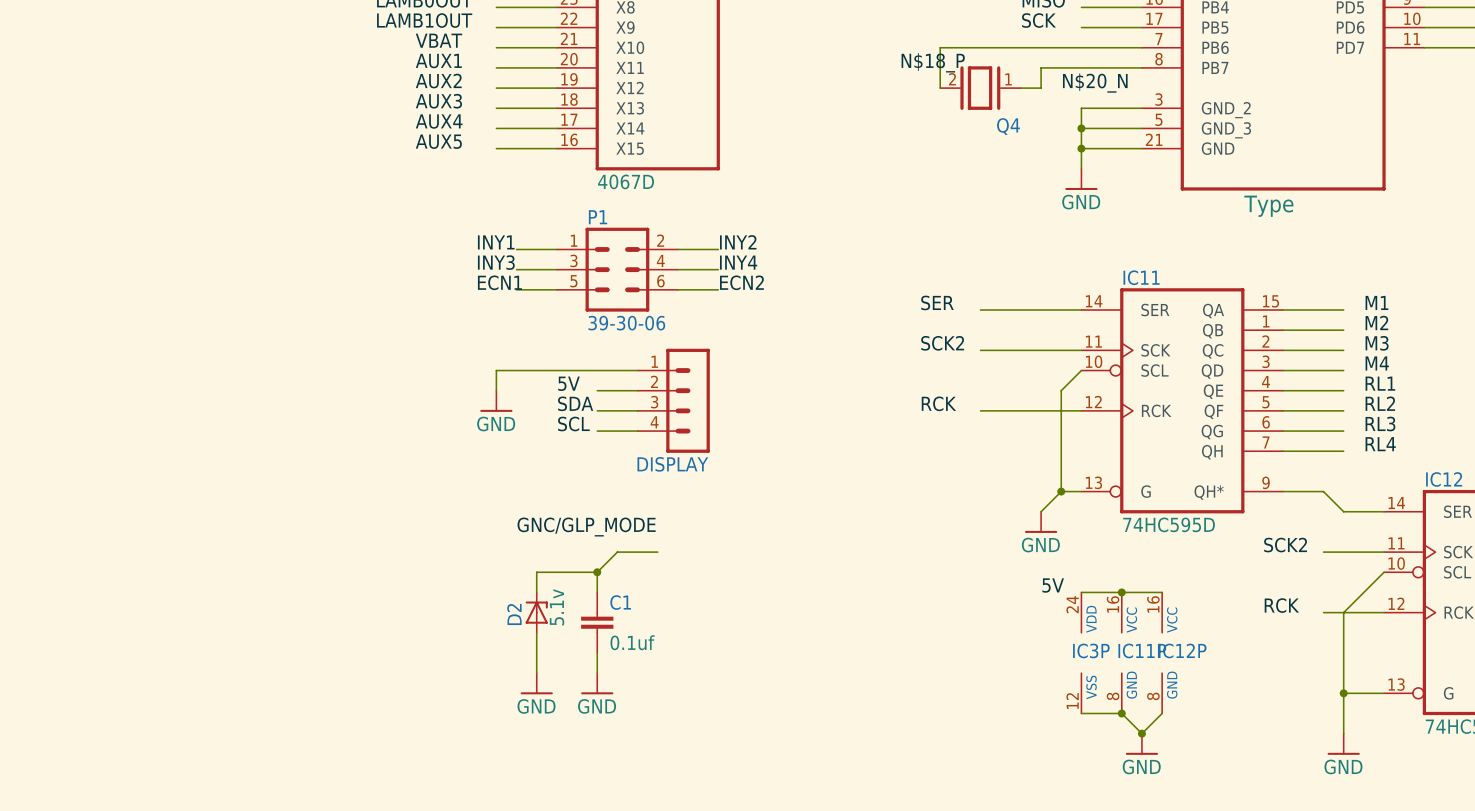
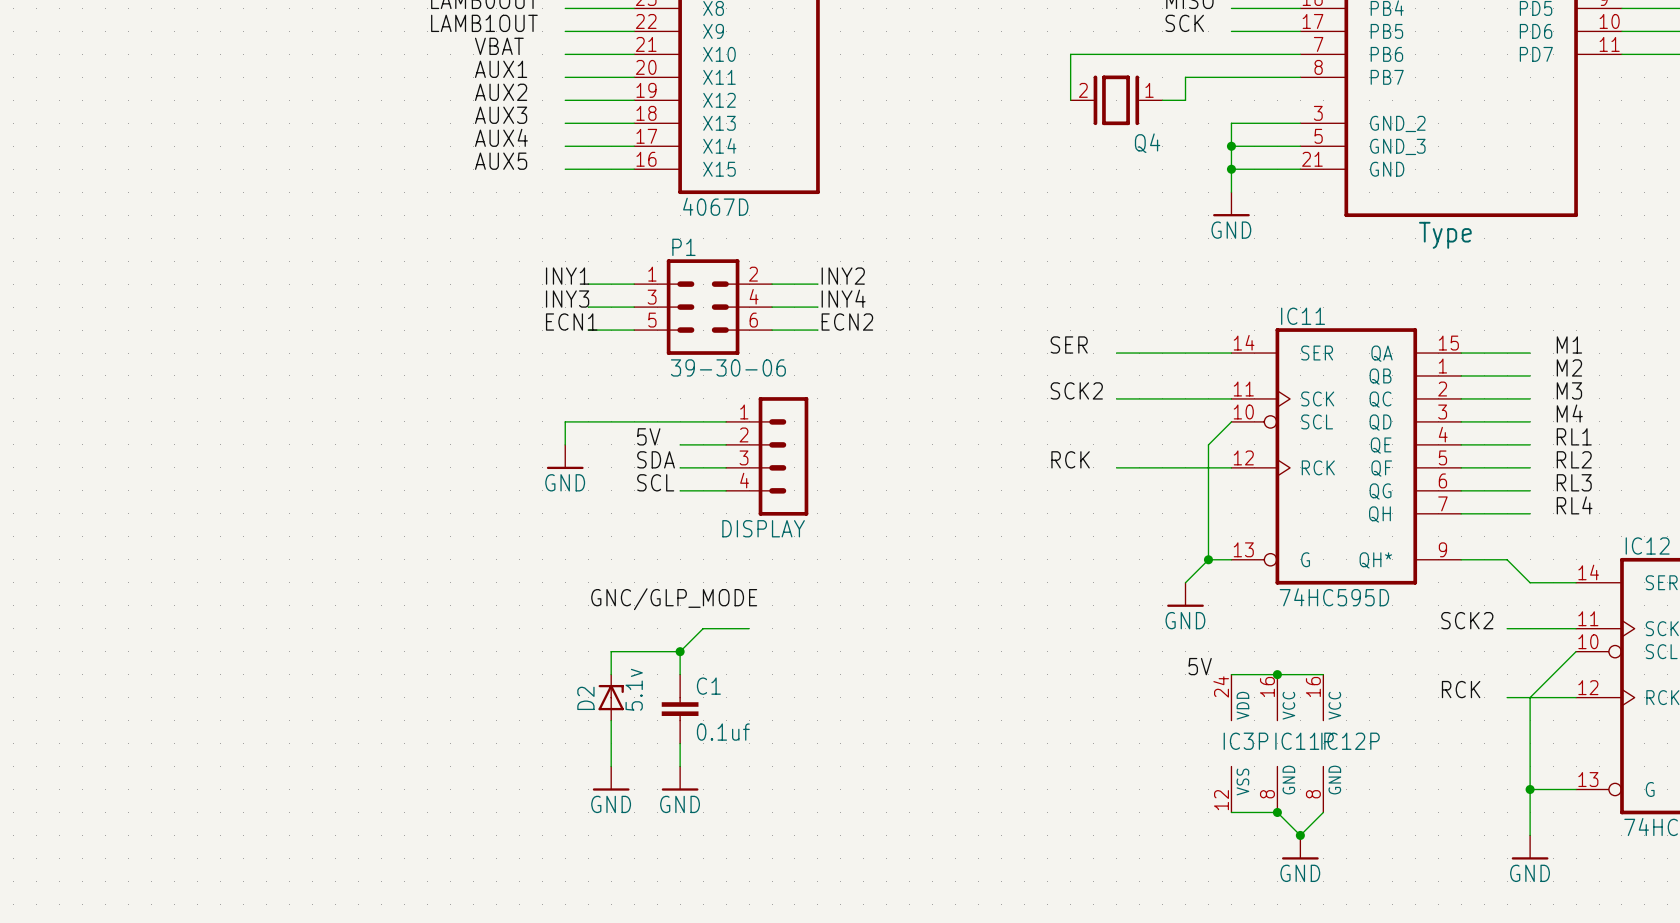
label: N$18_P (933, 62) -> none
label: N$20_N (1095, 83) -> none

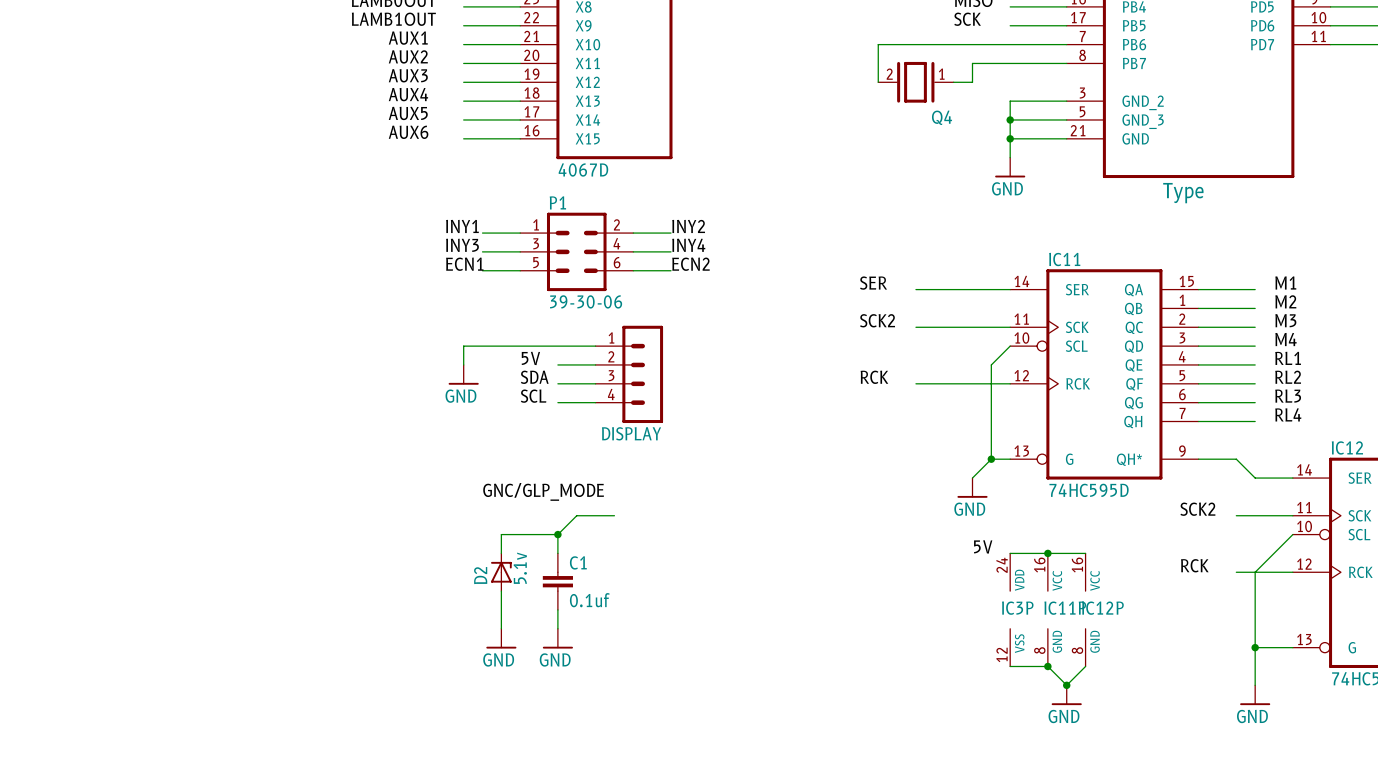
label: VBAT (499, 46) -> AUX1 (408, 38)
label: AUX1 (501, 69) -> AUX2 (408, 56)
label: AUX2 (501, 92) -> AUX3 (408, 75)
label: AUX3 (501, 115) -> AUX4 (408, 94)
label: AUX4 (501, 137) -> AUX5 (408, 113)
label: AUX5 (501, 161) -> AUX6 (408, 132)

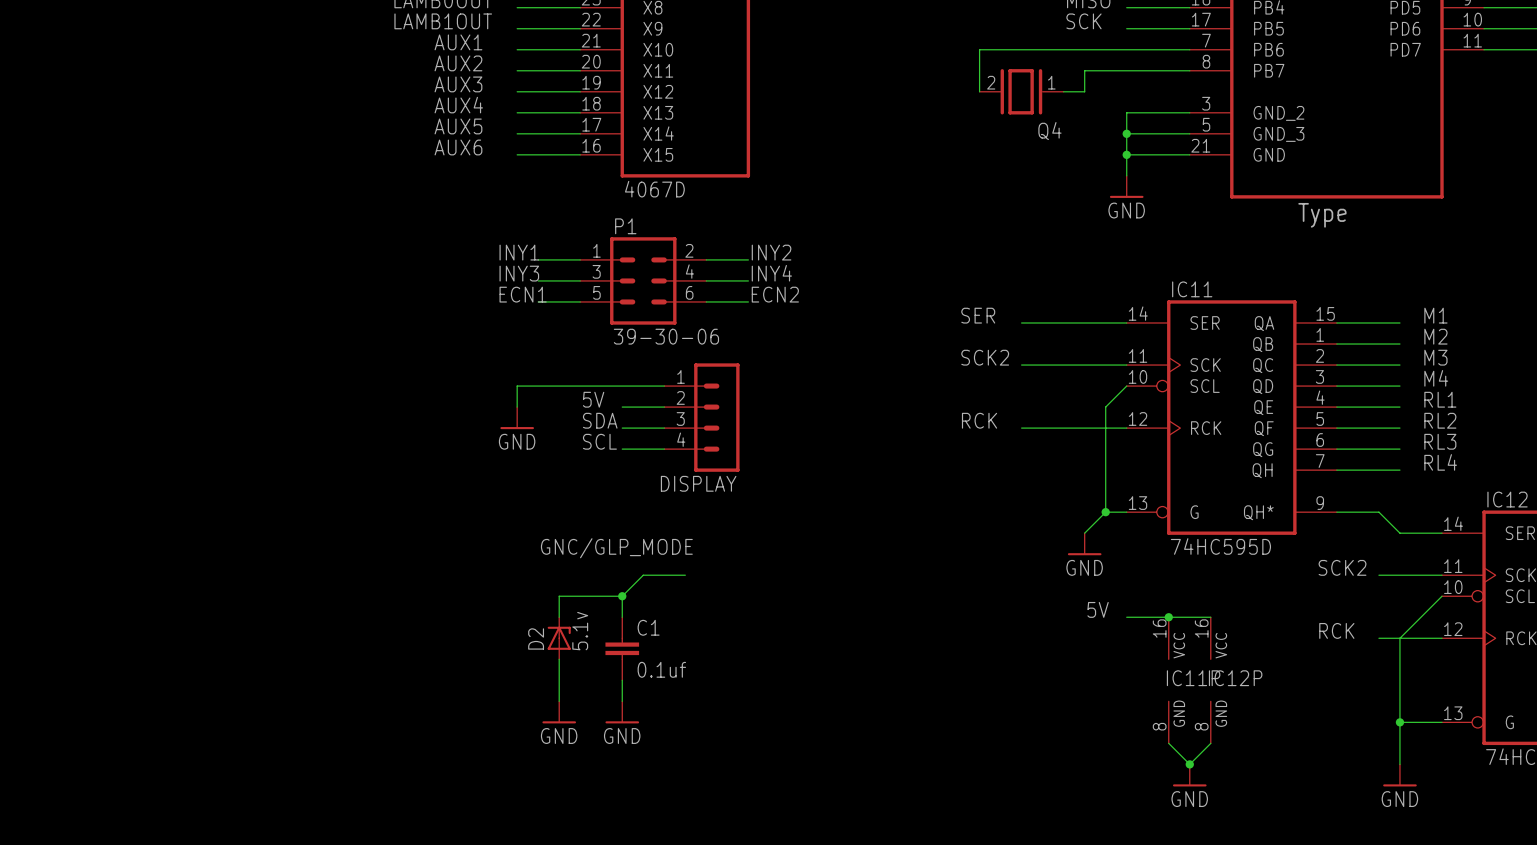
IC3P: (1010, 609) -> none
wire: (1010, 666) (1047, 666) -> none
junction: (1047, 666) -> none

